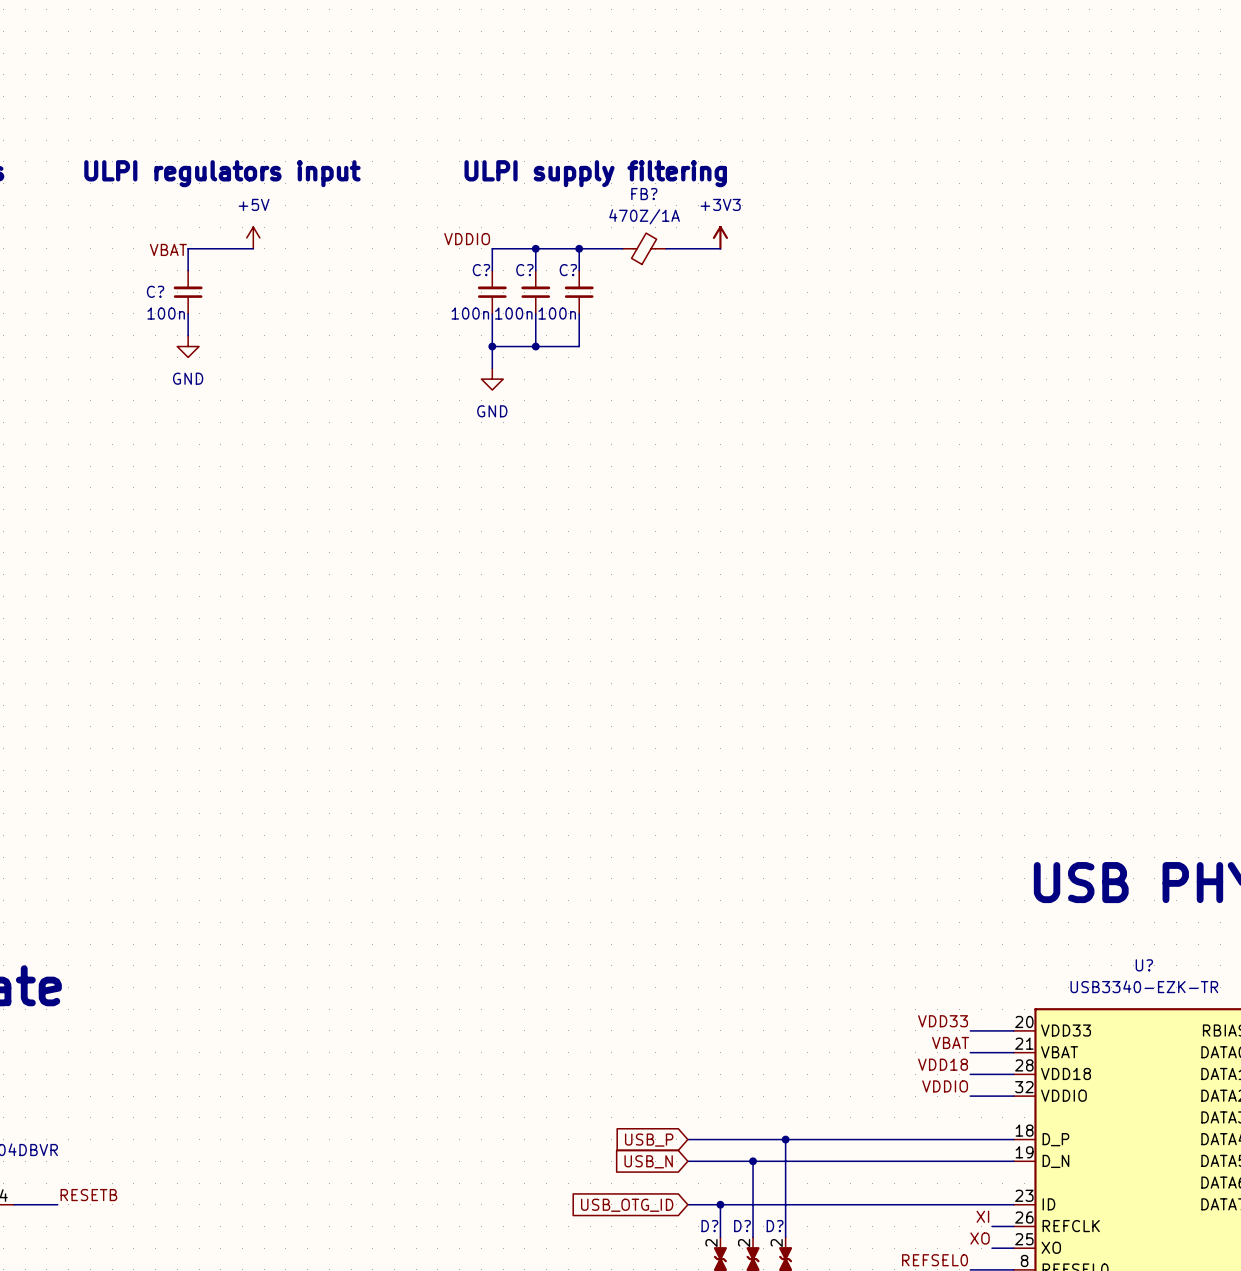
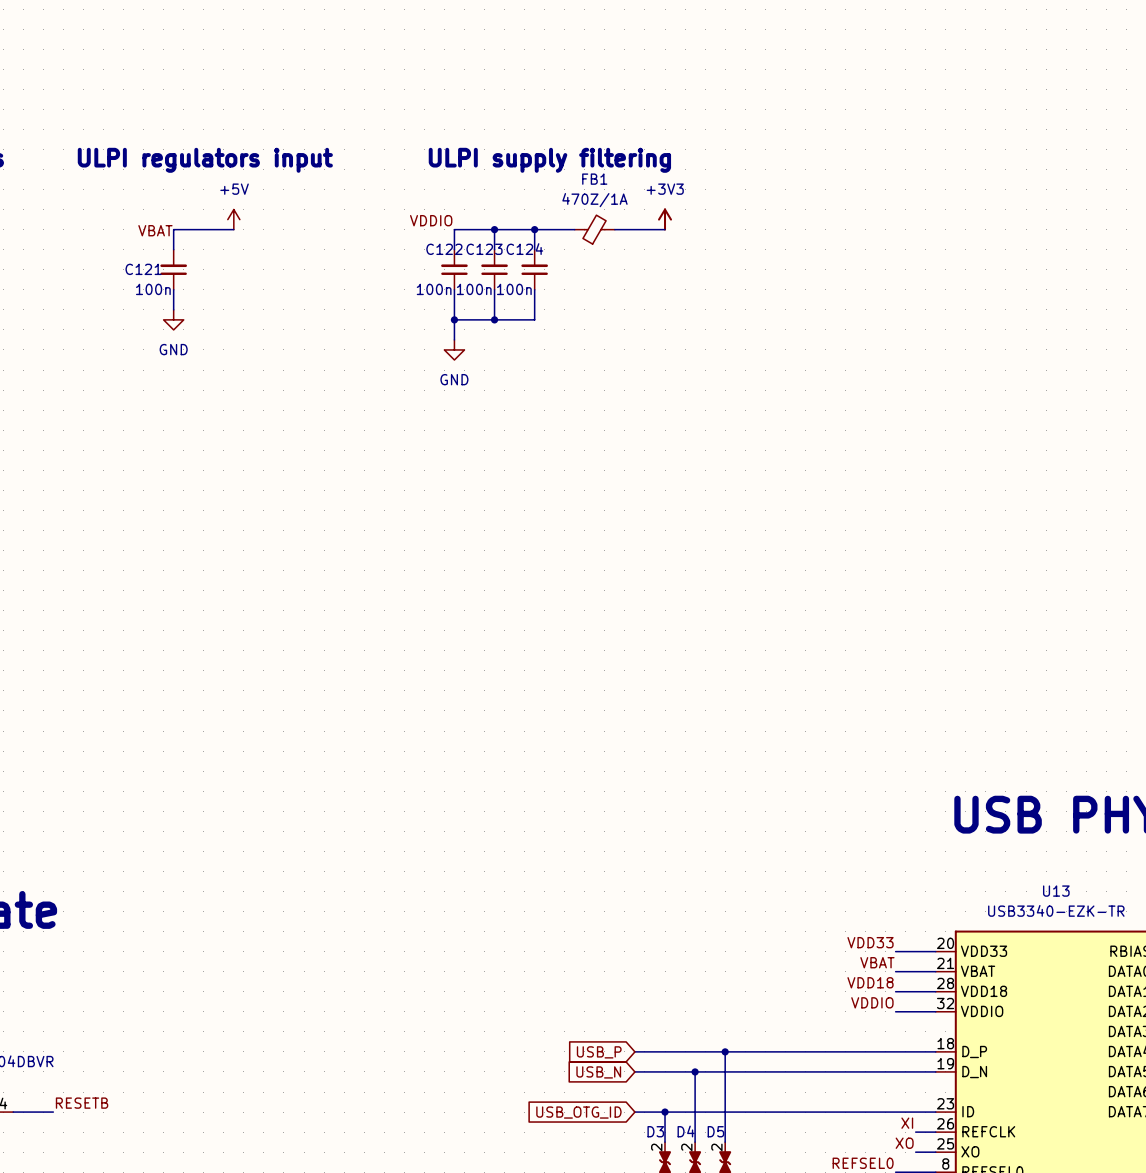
FB? name: FB? (644, 194) -> FB1 (594, 179)
C? name: C? (481, 270) -> C122 (444, 249)
C? name: C? (524, 270) -> C123 (484, 249)
C? name: C? (568, 270) -> C124 (524, 249)
C? name: C? (155, 291) -> C121 (143, 269)
U? name: U? (1144, 965) -> U13 (1056, 891)
D? name: D? (709, 1226) -> D3 (655, 1131)
D? name: D? (742, 1226) -> D4 (686, 1131)
D? name: D? (775, 1226) -> D5 (715, 1131)

